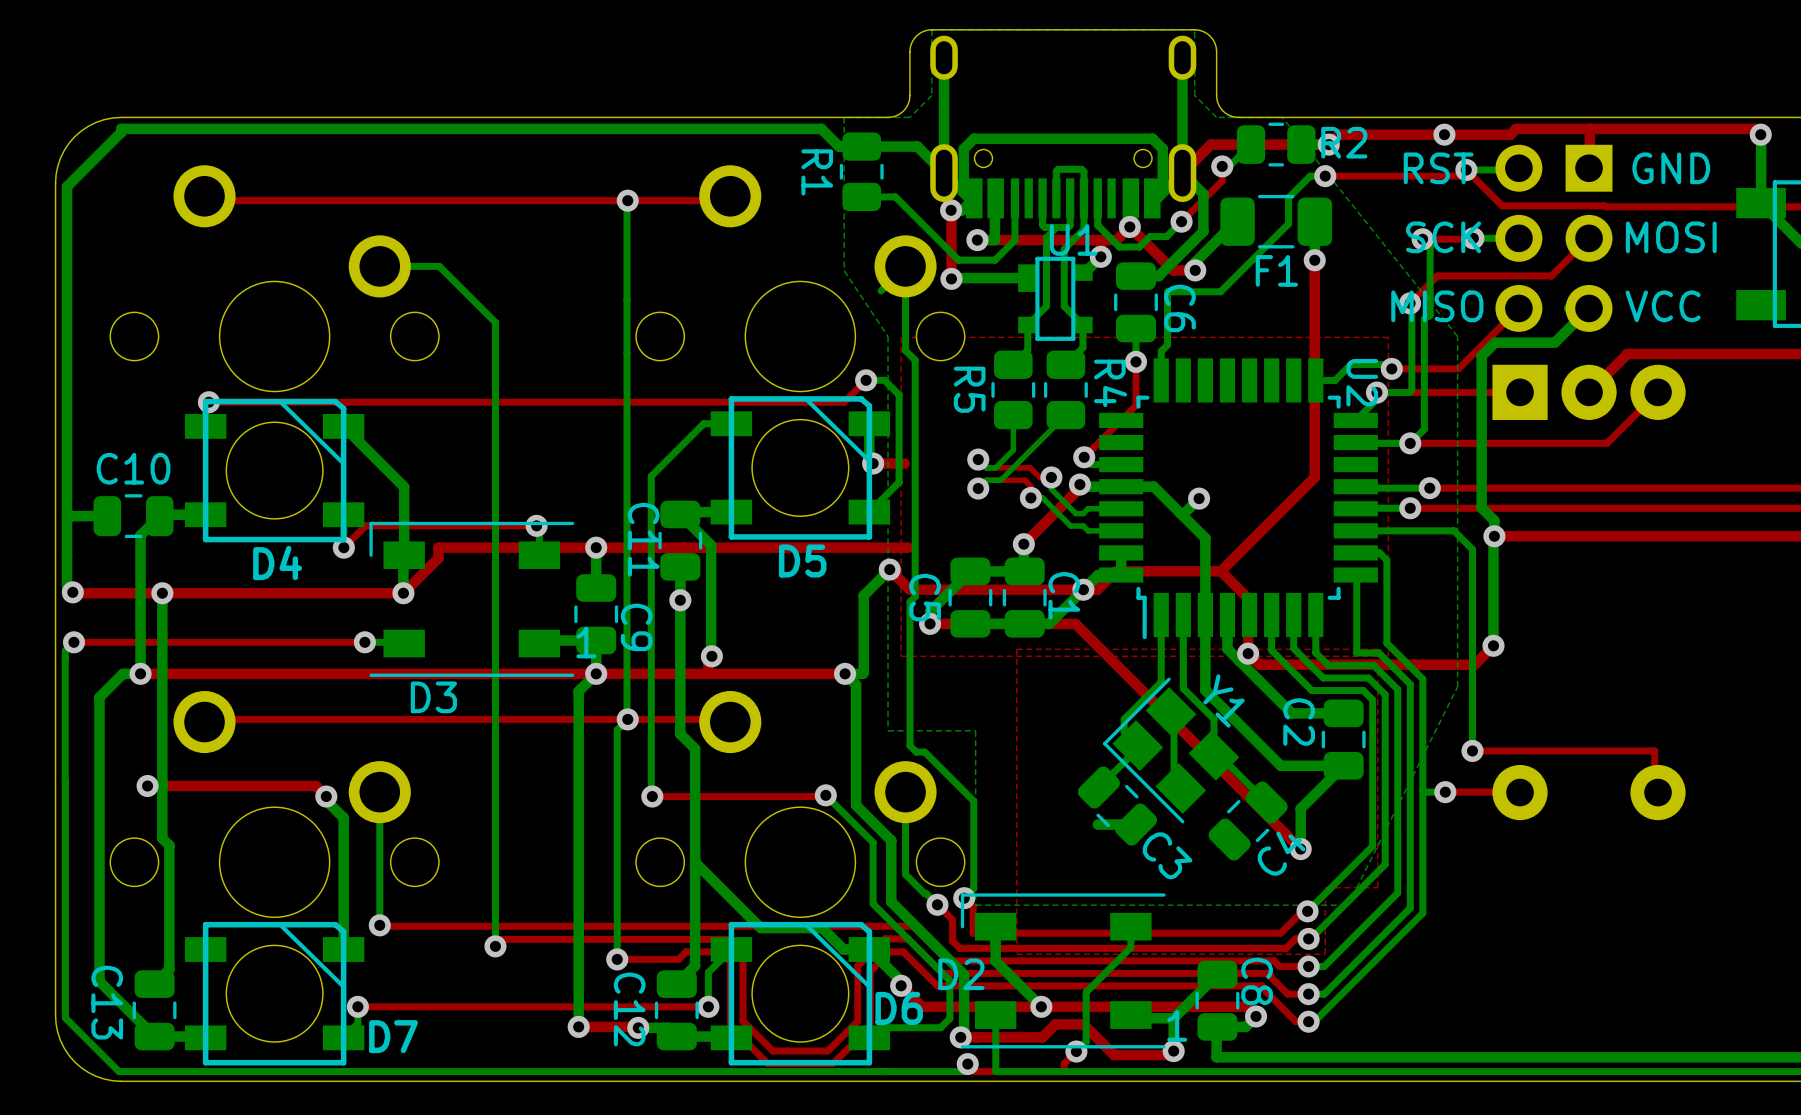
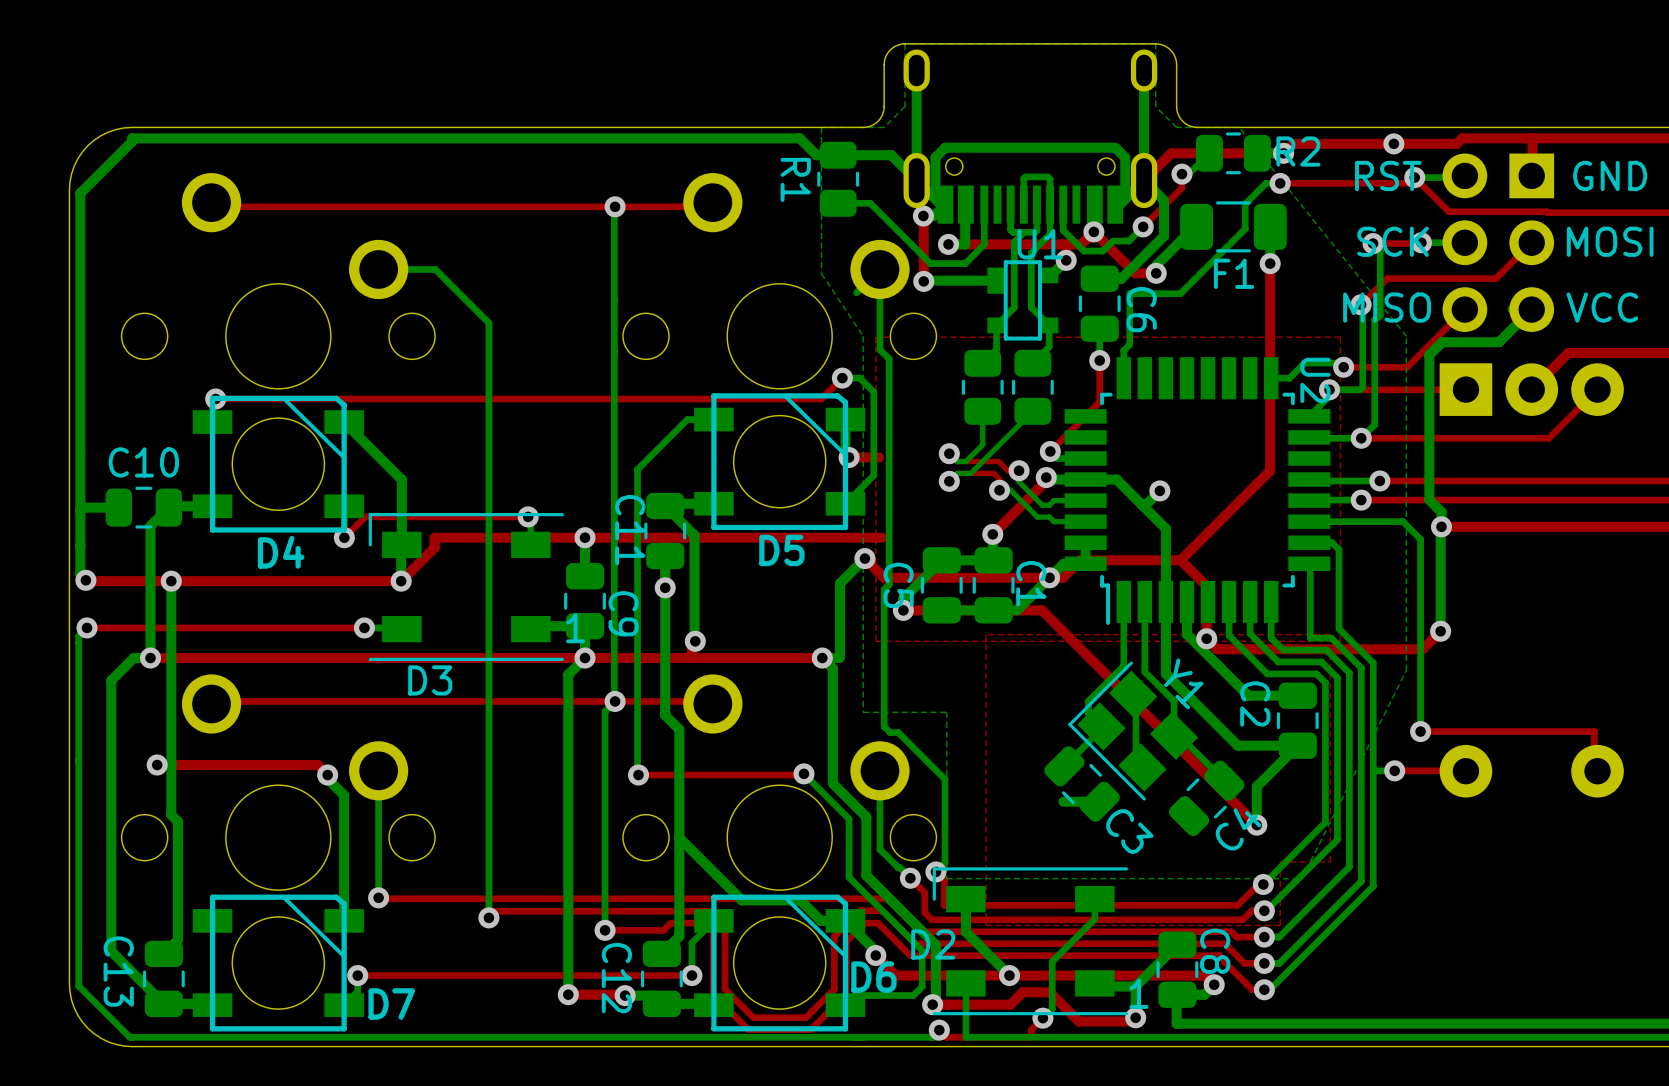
R4 name: R4 (1110, 383) -> none
R5 name: R5 (969, 389) -> none

